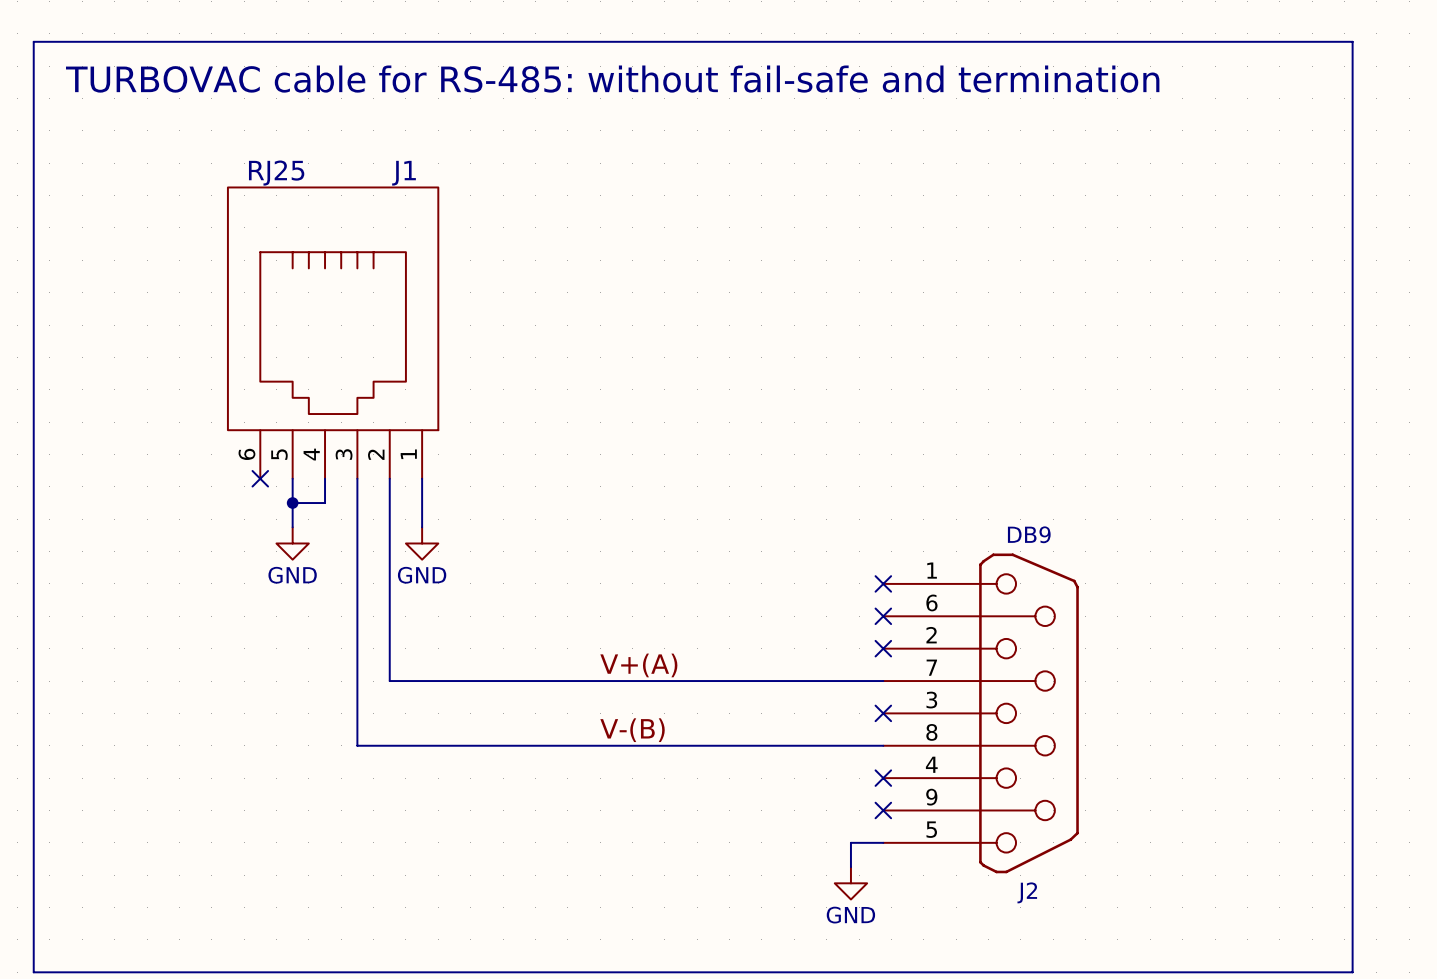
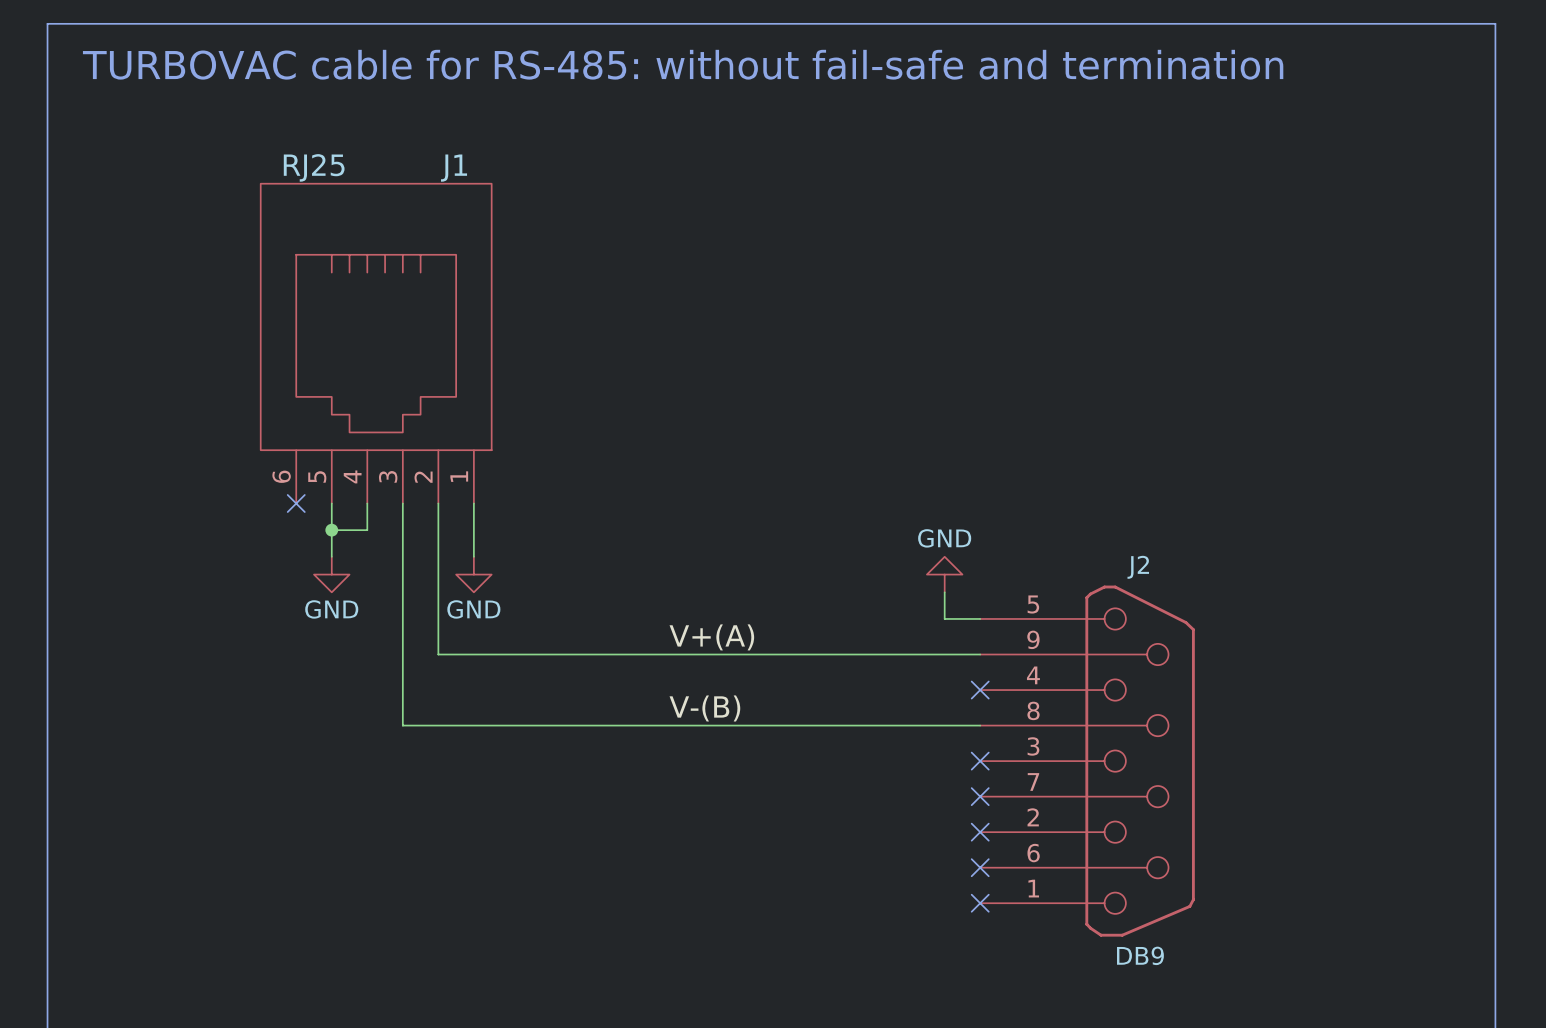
power symbol: none -> GND (944, 574)
wire: none -> (944, 592) (944, 618) (980, 618)
no-connect mark: (883, 583) -> none
label: none -> V+(A) (711, 637)
wire: (389, 616) (389, 681) -> (402, 725) (438, 725)
wire: none -> (438, 654) (980, 654)
no-connect mark: (883, 616) -> none
label: V+(A) (638, 665) -> V-(B) (704, 708)
wire: (357, 681) (357, 745) (883, 745) -> none
J2 flip: as is (1028, 713) -> up-down (1140, 761)
label: V-(B) (632, 730) -> none
no-connect mark: none -> (980, 796)
wire: (883, 842) (850, 842) (850, 867) -> none
no-connect mark: none -> (980, 903)
power symbol: GND (850, 883) -> none

